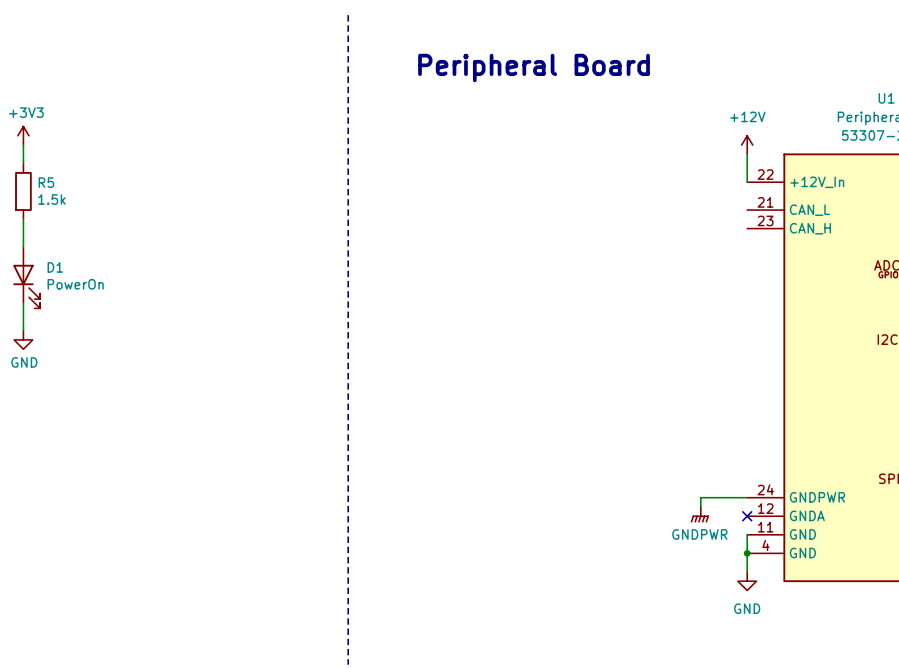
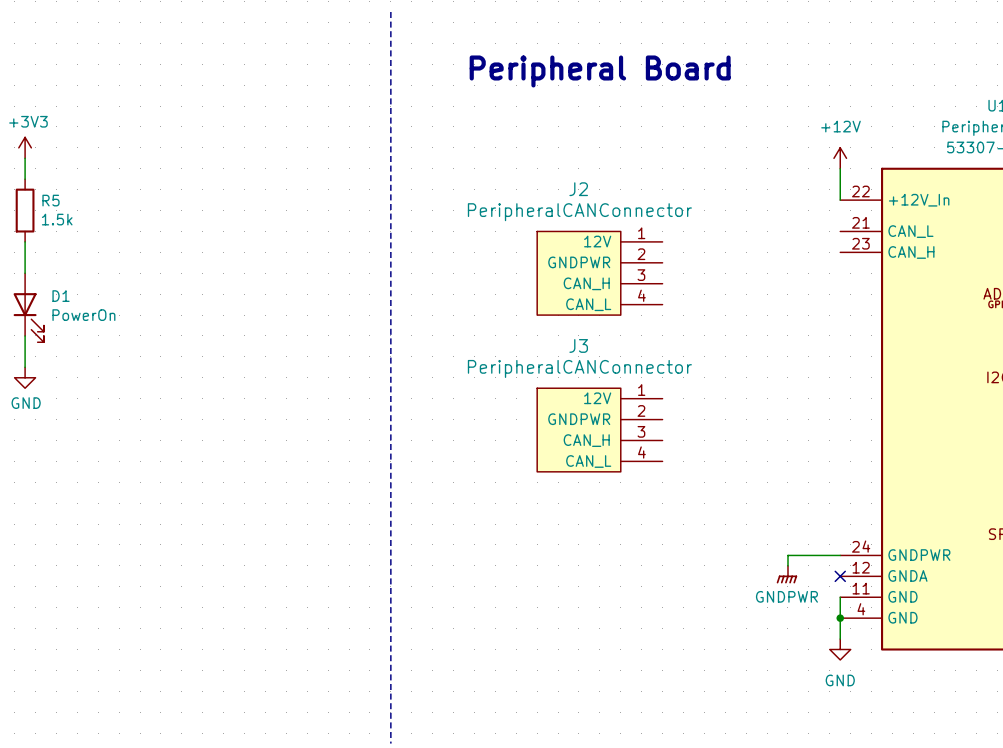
J2: none -> PeripheralCANConnector (599, 273)
J3: none -> PeripheralCANConnector (599, 430)

